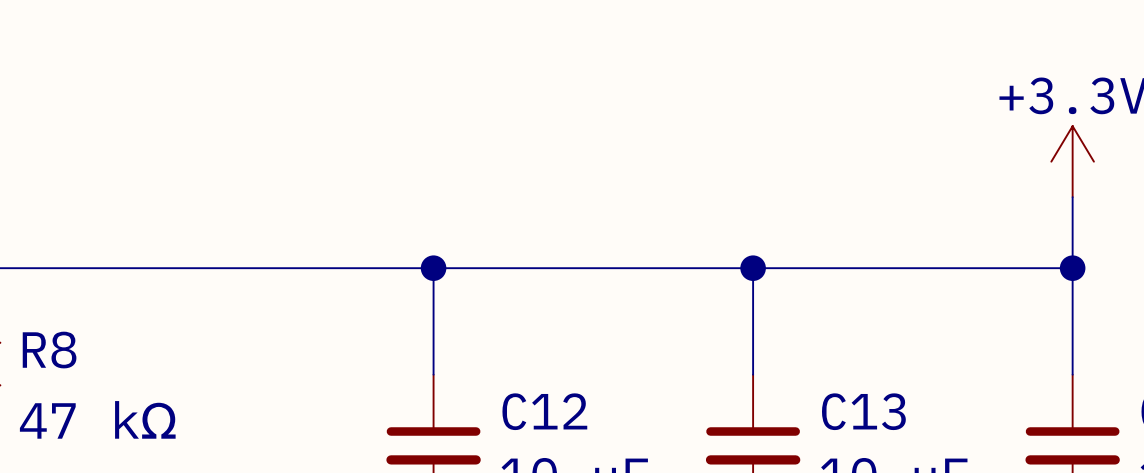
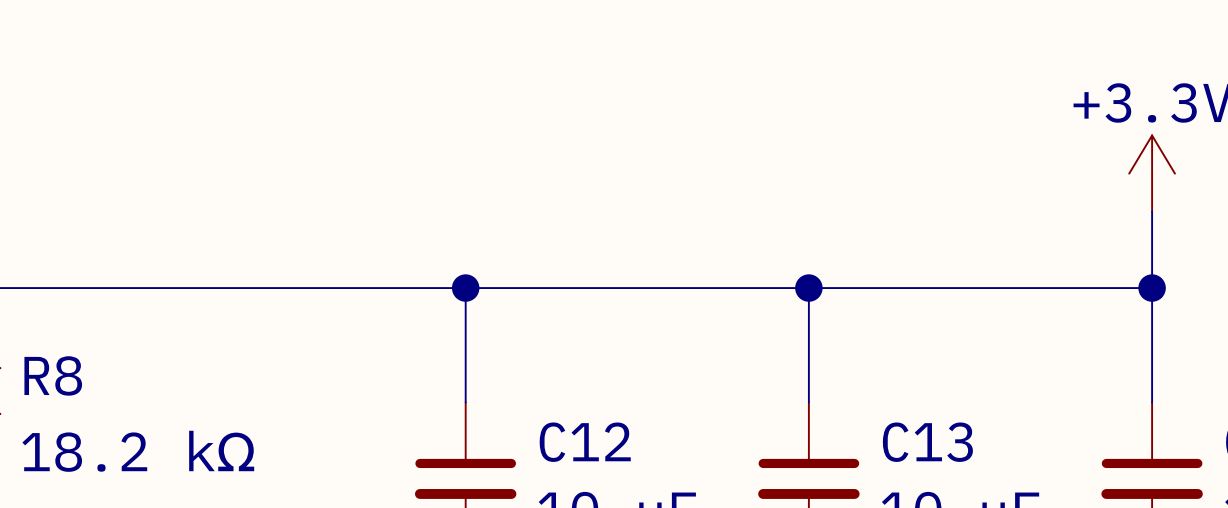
R8 value: 47 kΩ (97, 419) -> 18.2 kΩ (138, 451)

